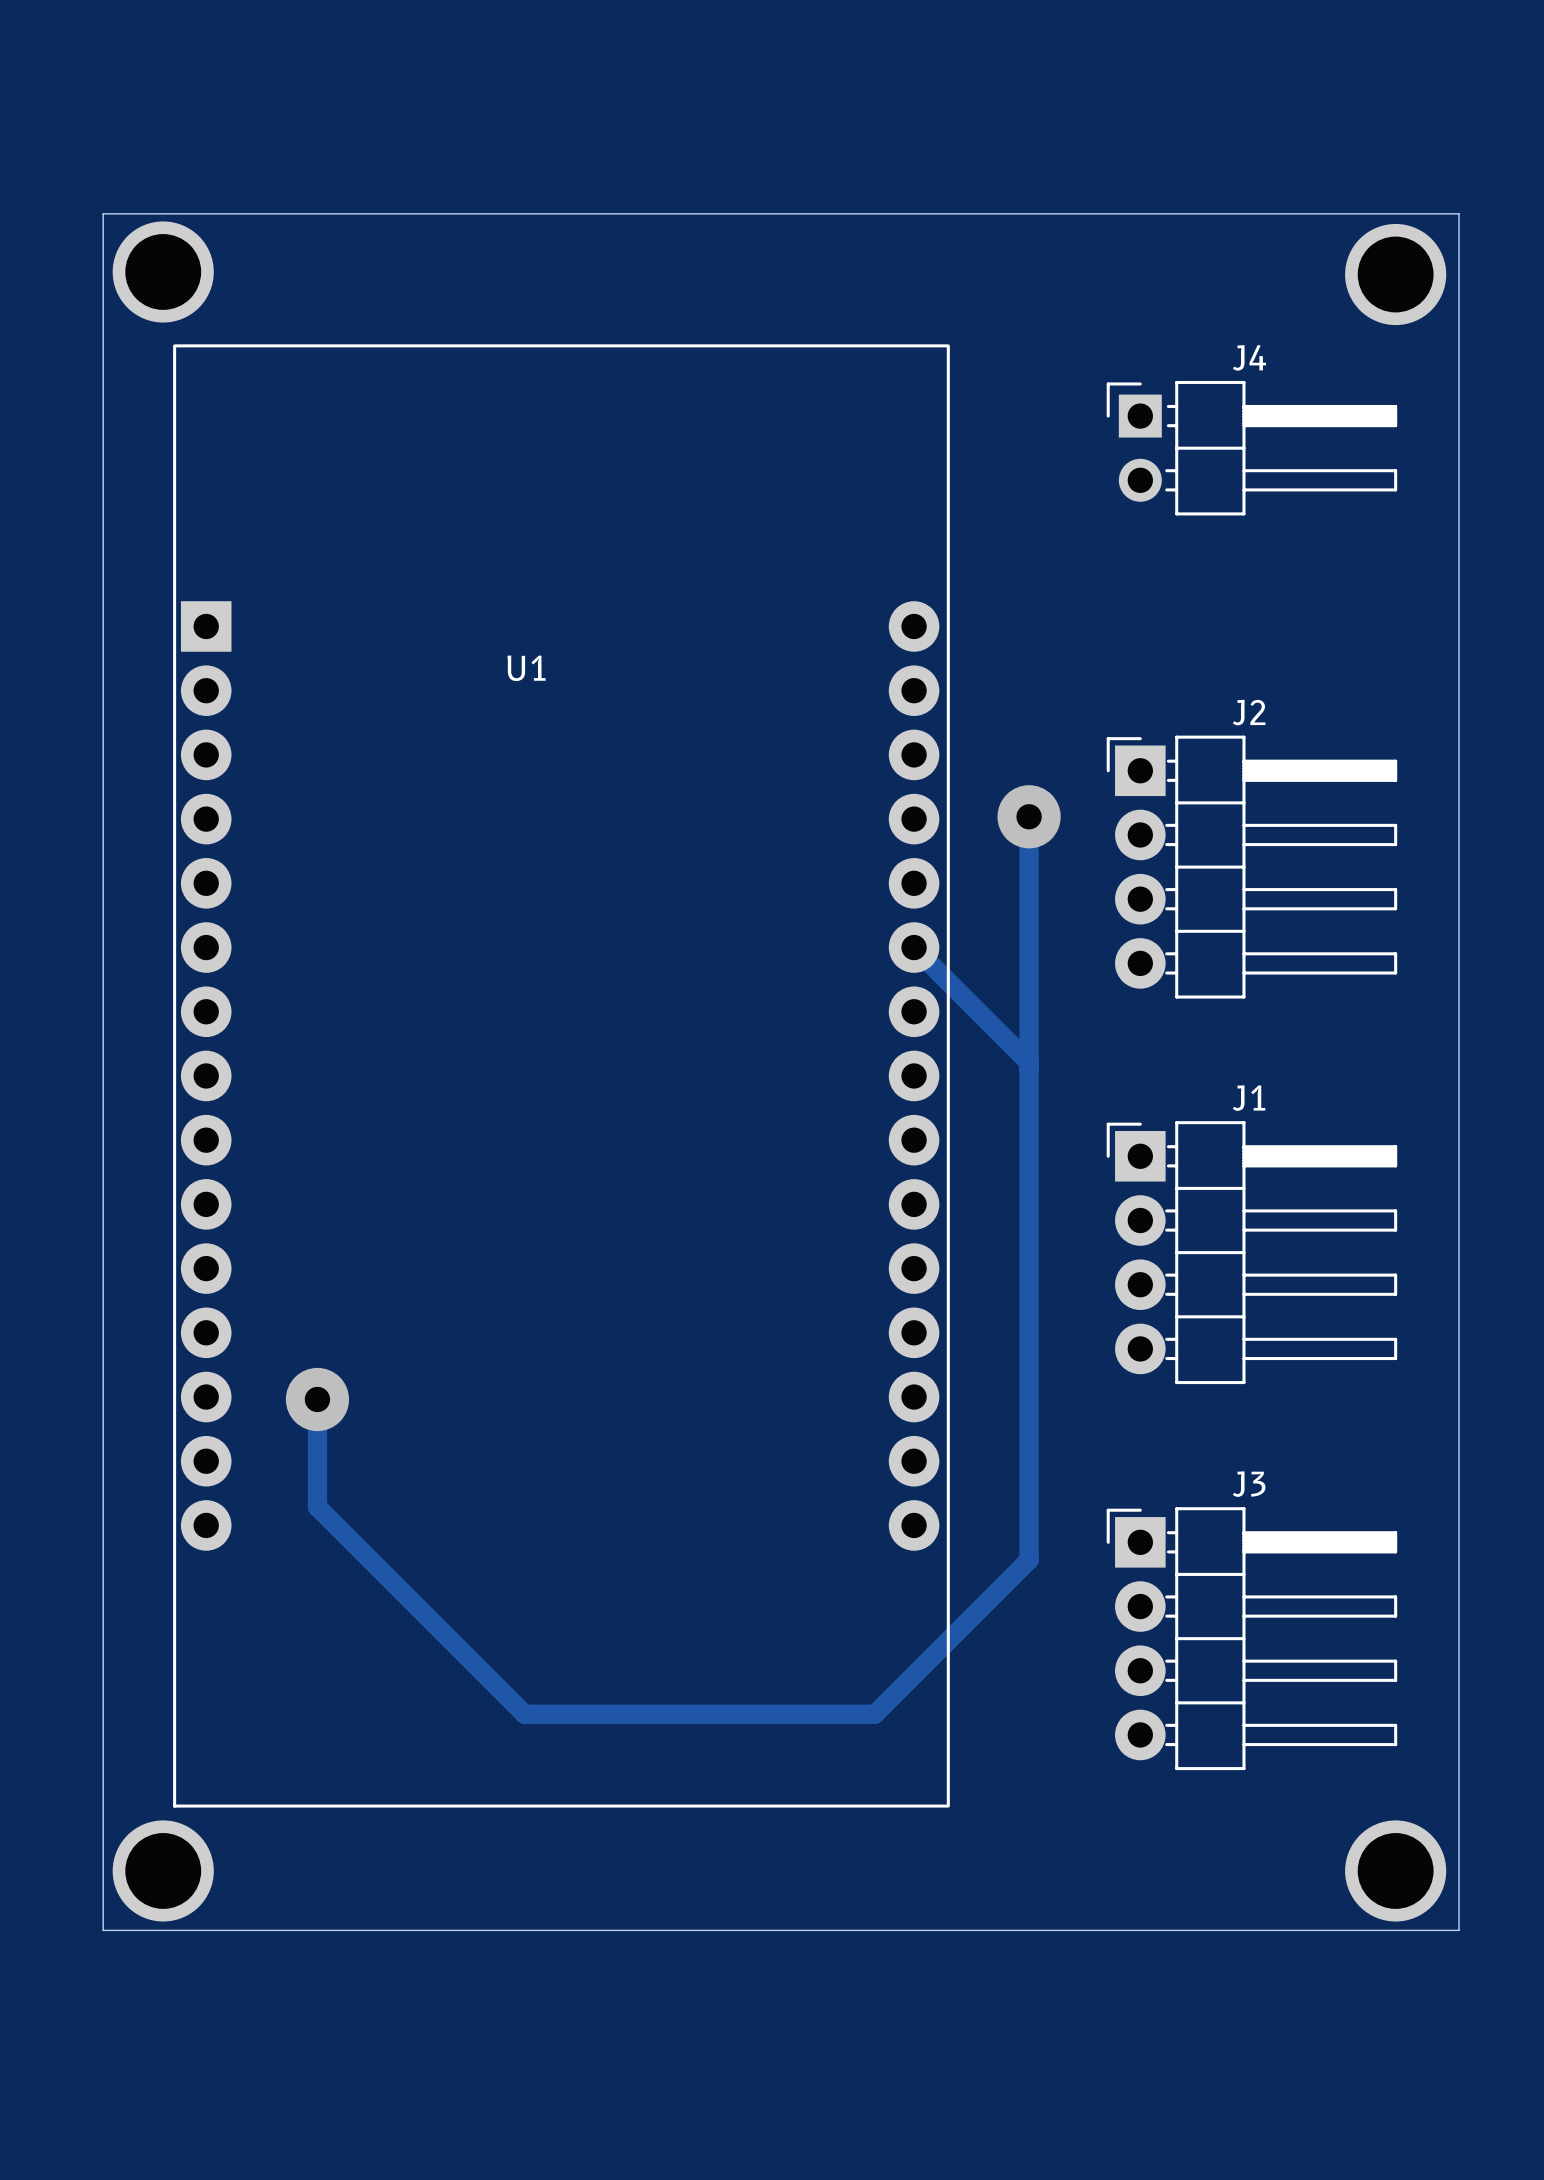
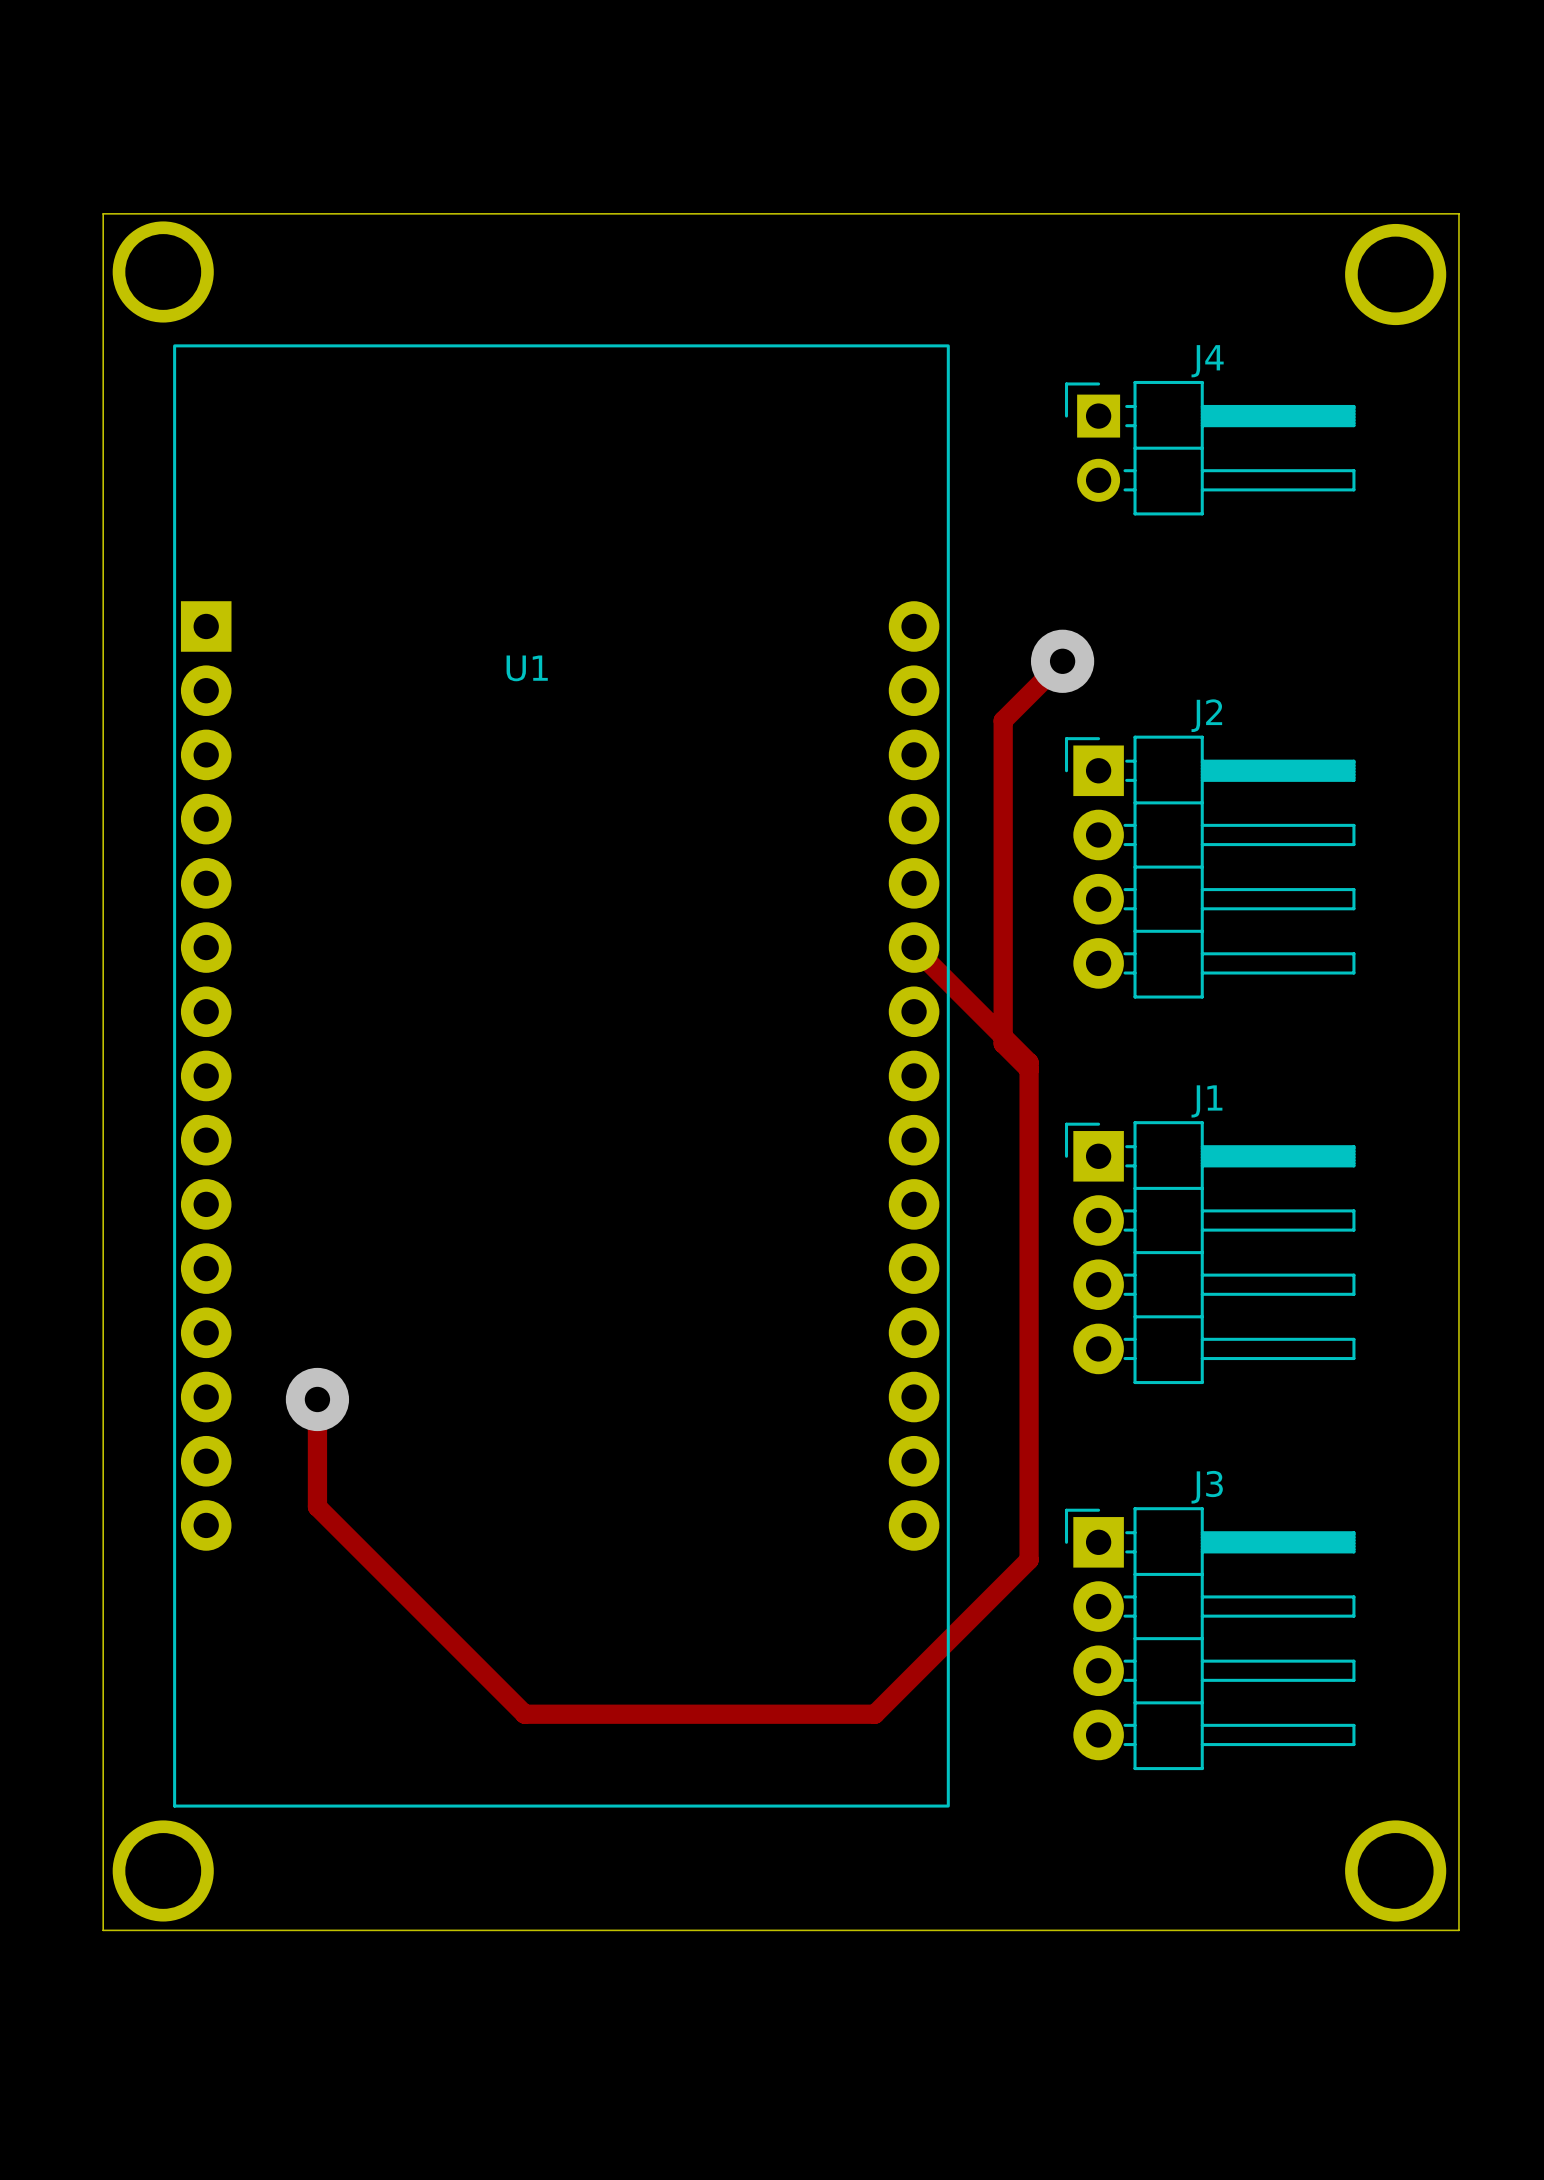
J4 position: (1251, 448) -> (1210, 448)
track: none -> (1062, 661) (1003, 720) (1003, 1043) (1029, 1069)
via: none -> (1062, 661)
track: (1029, 816) (1029, 1062) -> none
via: (1029, 816) -> none
J2 position: (1251, 867) -> (1210, 867)
J1 position: (1251, 1252) -> (1210, 1252)
J3 position: (1251, 1638) -> (1210, 1638)

